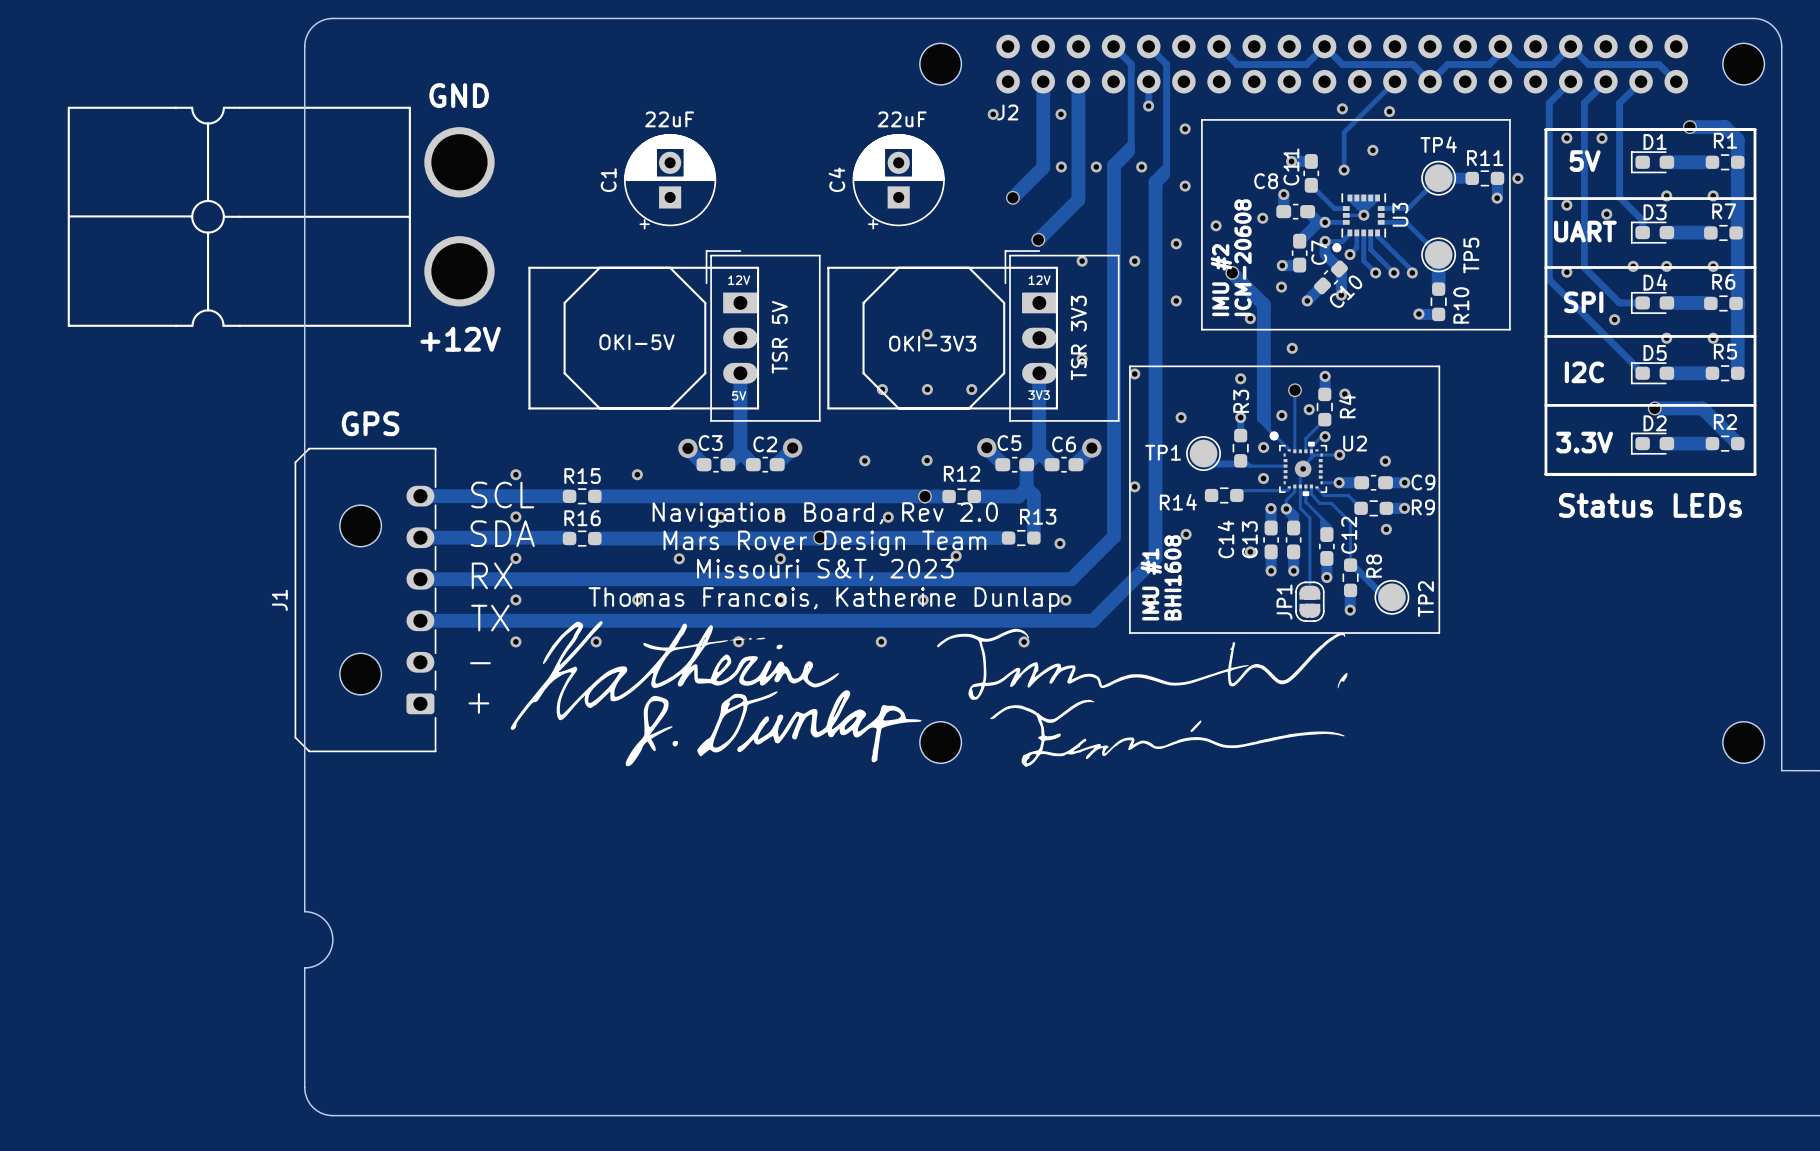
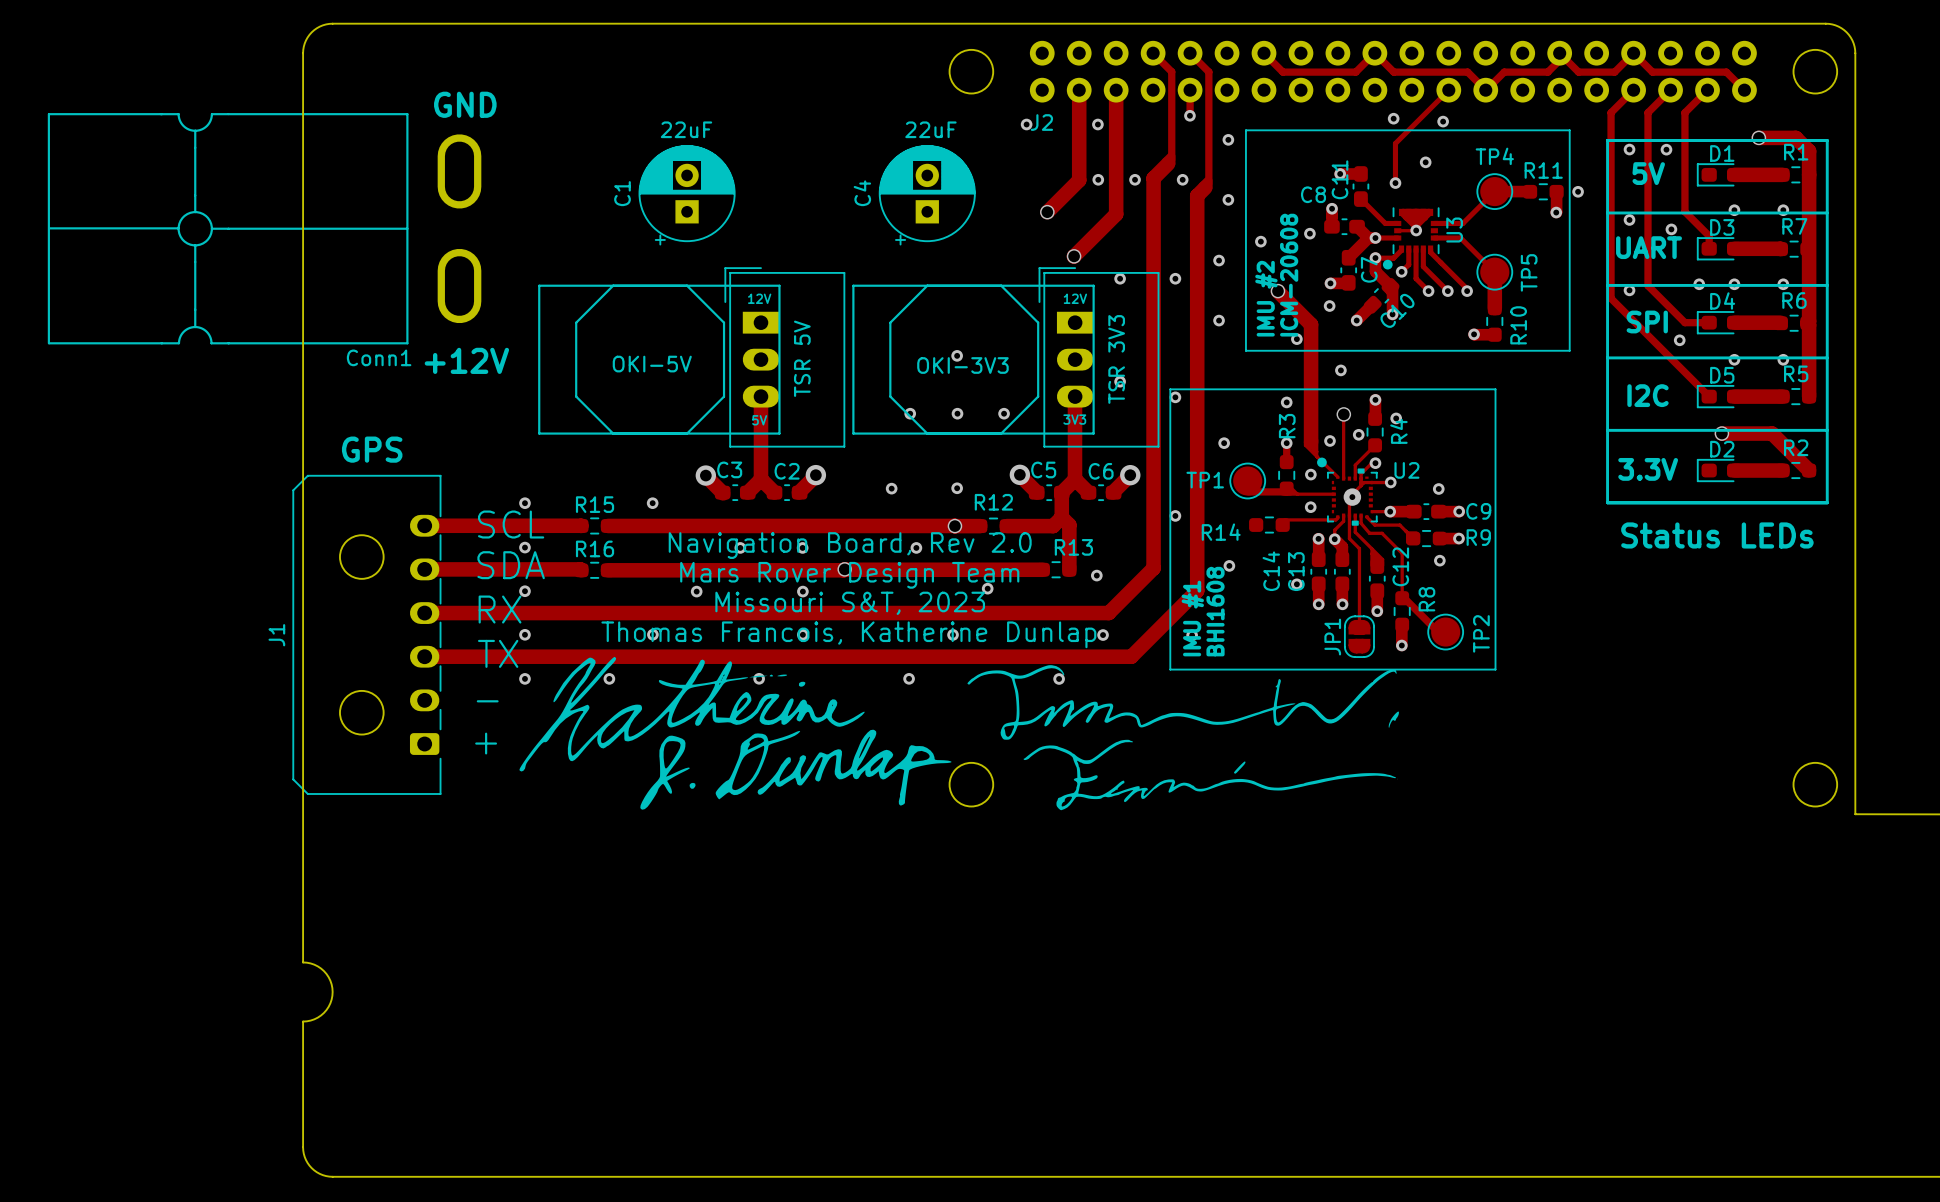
Conn1: none -> (264, 228)
part: (281, 216) -> none

